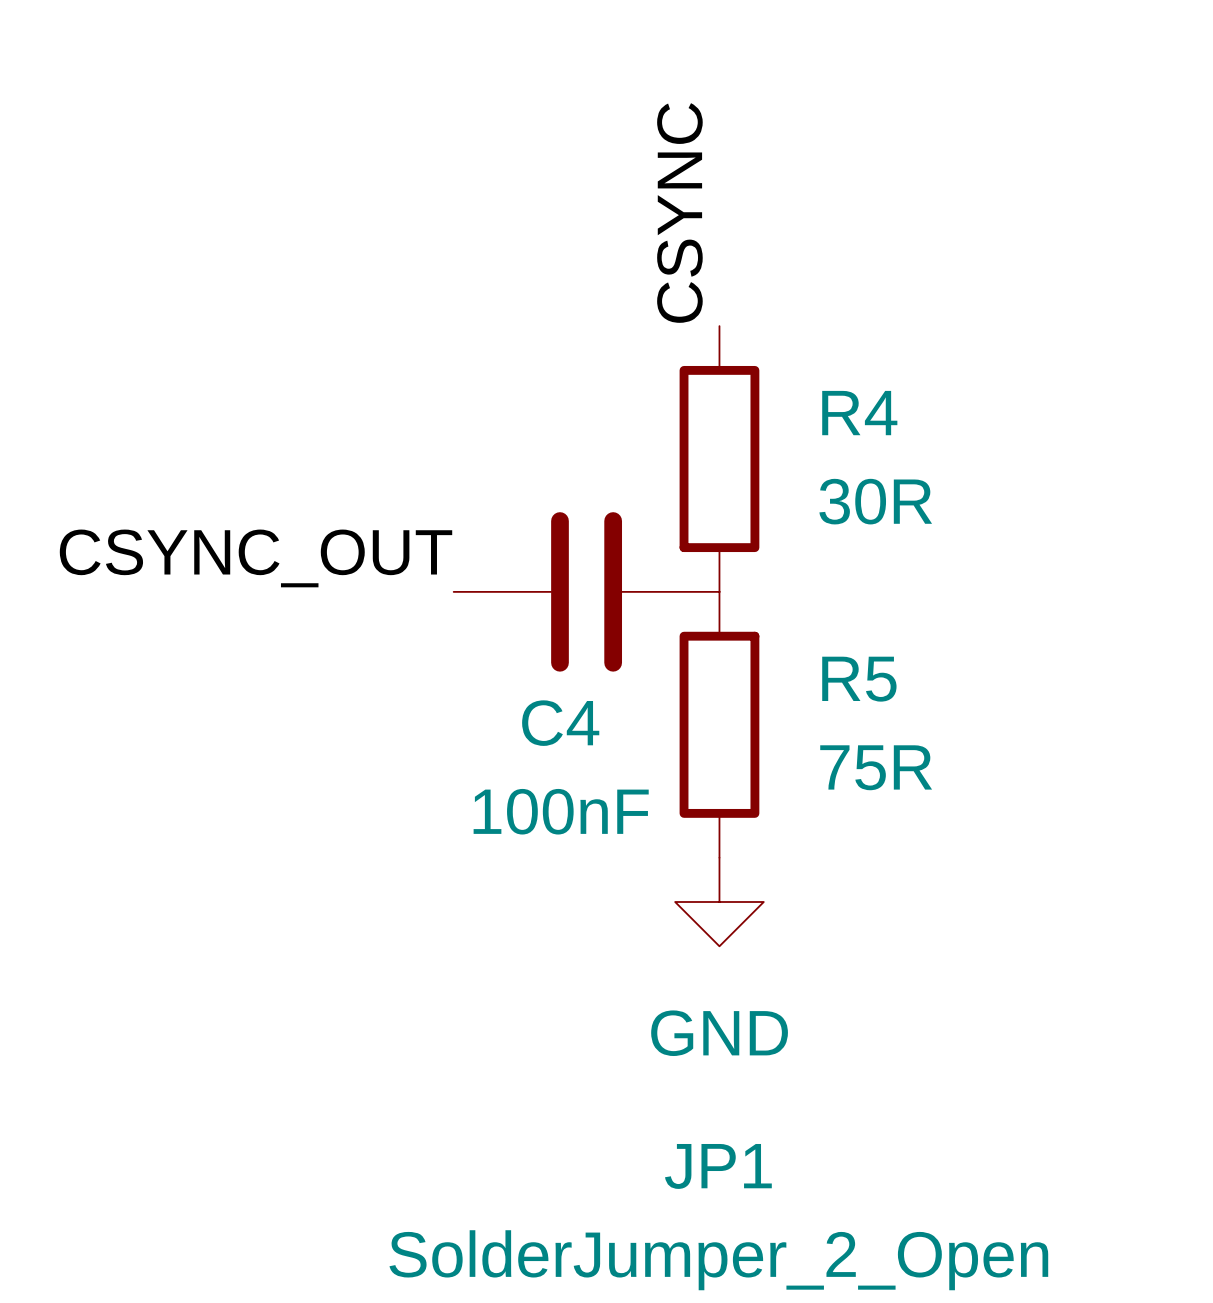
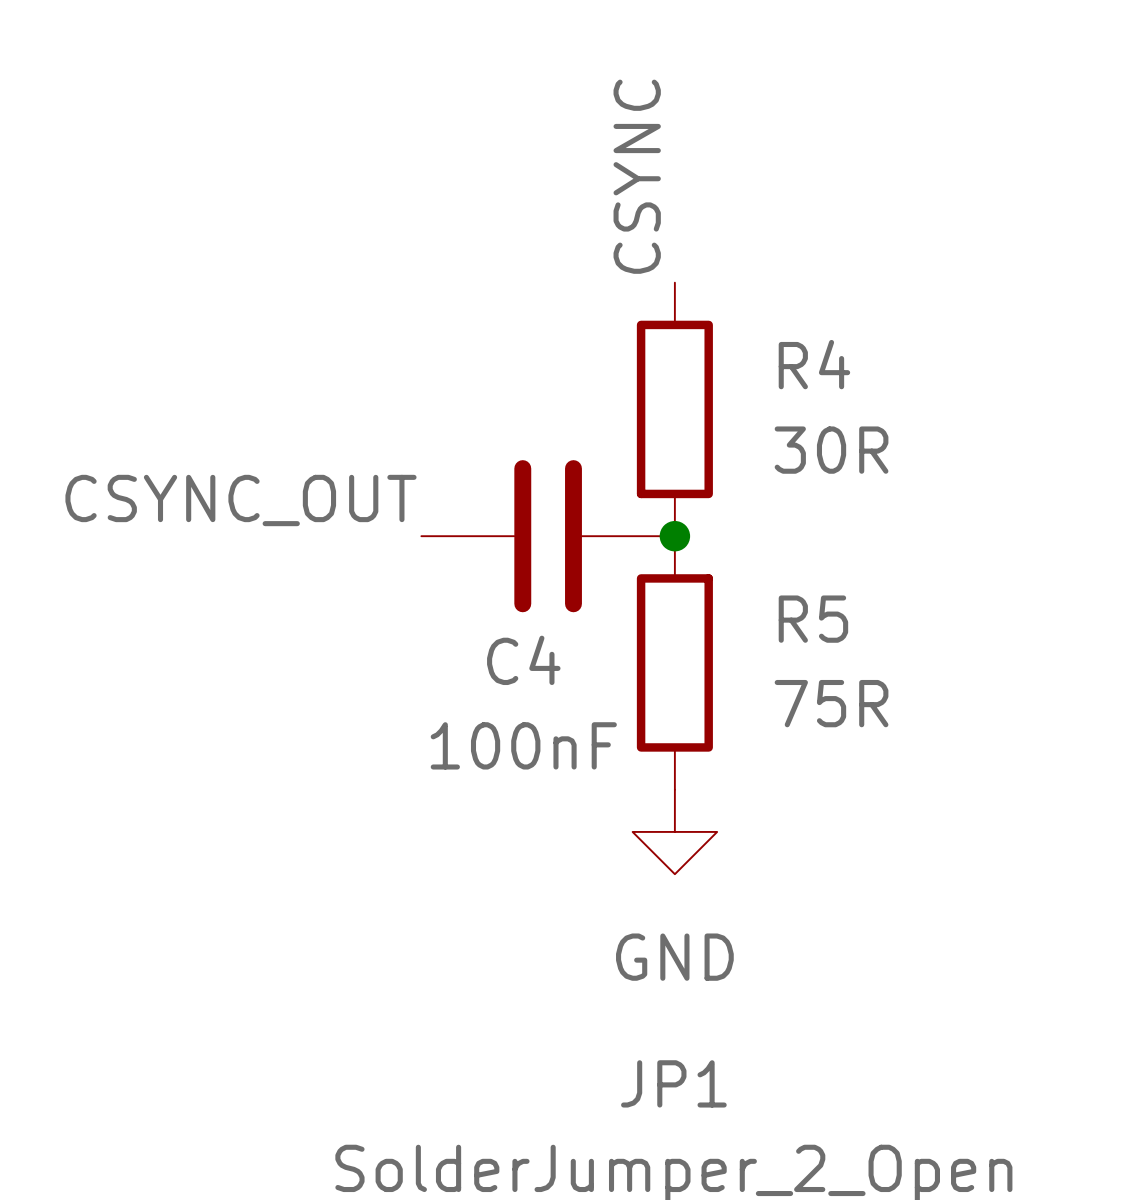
junction: none -> (674, 536)

